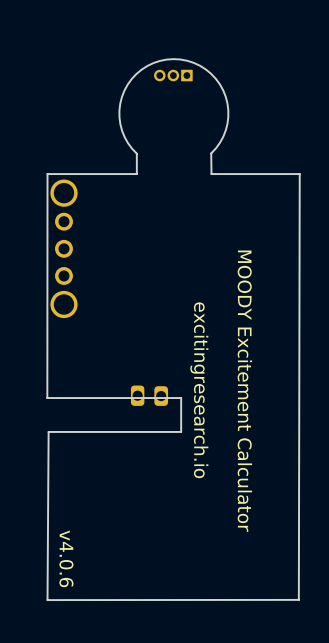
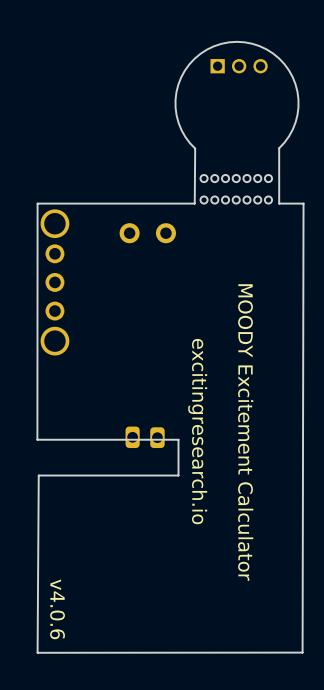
part: none -> (239, 66)
part: (173, 75) -> none
part: none -> (236, 189)
board edge: (276, 174) (211, 174) (211, 153) (219, 142) (227, 123) (228, 110) (225, 96) (219, 84) (205, 69) (187, 60) (173, 59) (160, 60) (141, 69) (127, 84) (121, 97) (119, 110) (120, 124) (124, 137) (136, 153) (136, 174) -> (279, 203) (279, 148) (292, 129) (297, 114) (298, 99) (295, 84) (284, 64) (273, 53) (252, 43) (236, 41) (221, 43) (200, 53) (184, 70) (178, 84) (175, 107) (178, 122) (185, 136) (195, 148) (194, 203) (131, 203)
part: none -> (147, 233)

